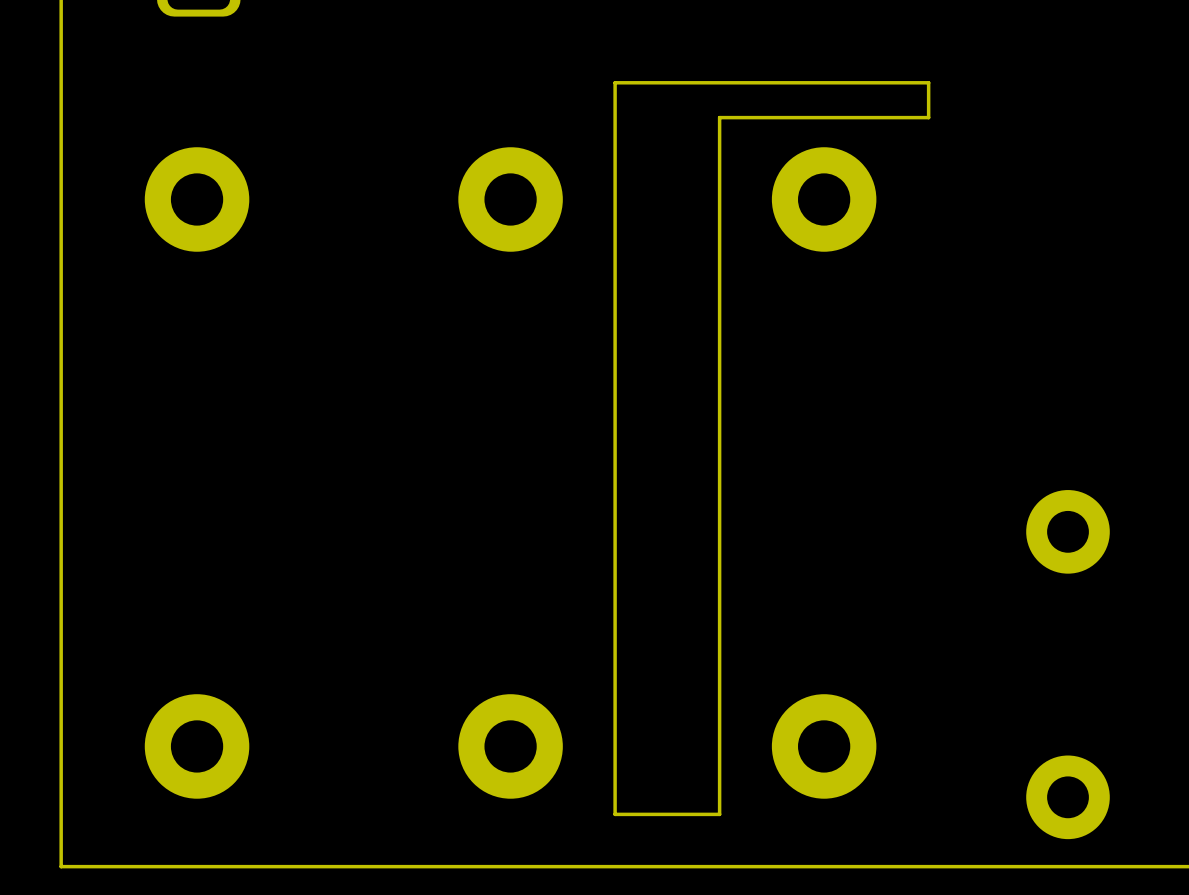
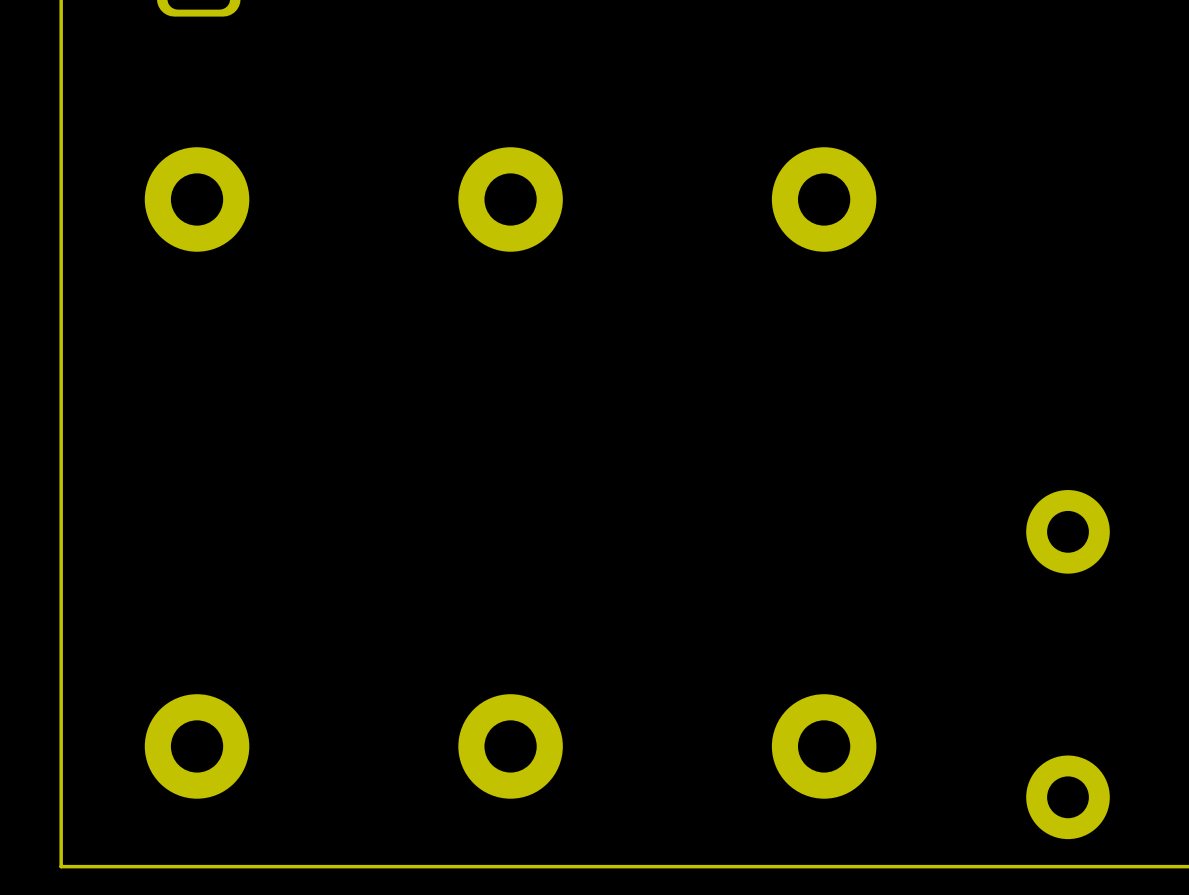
board edge: (928, 82) (615, 82) (615, 814) (719, 814) (719, 117) (928, 117) (928, 82) -> none

